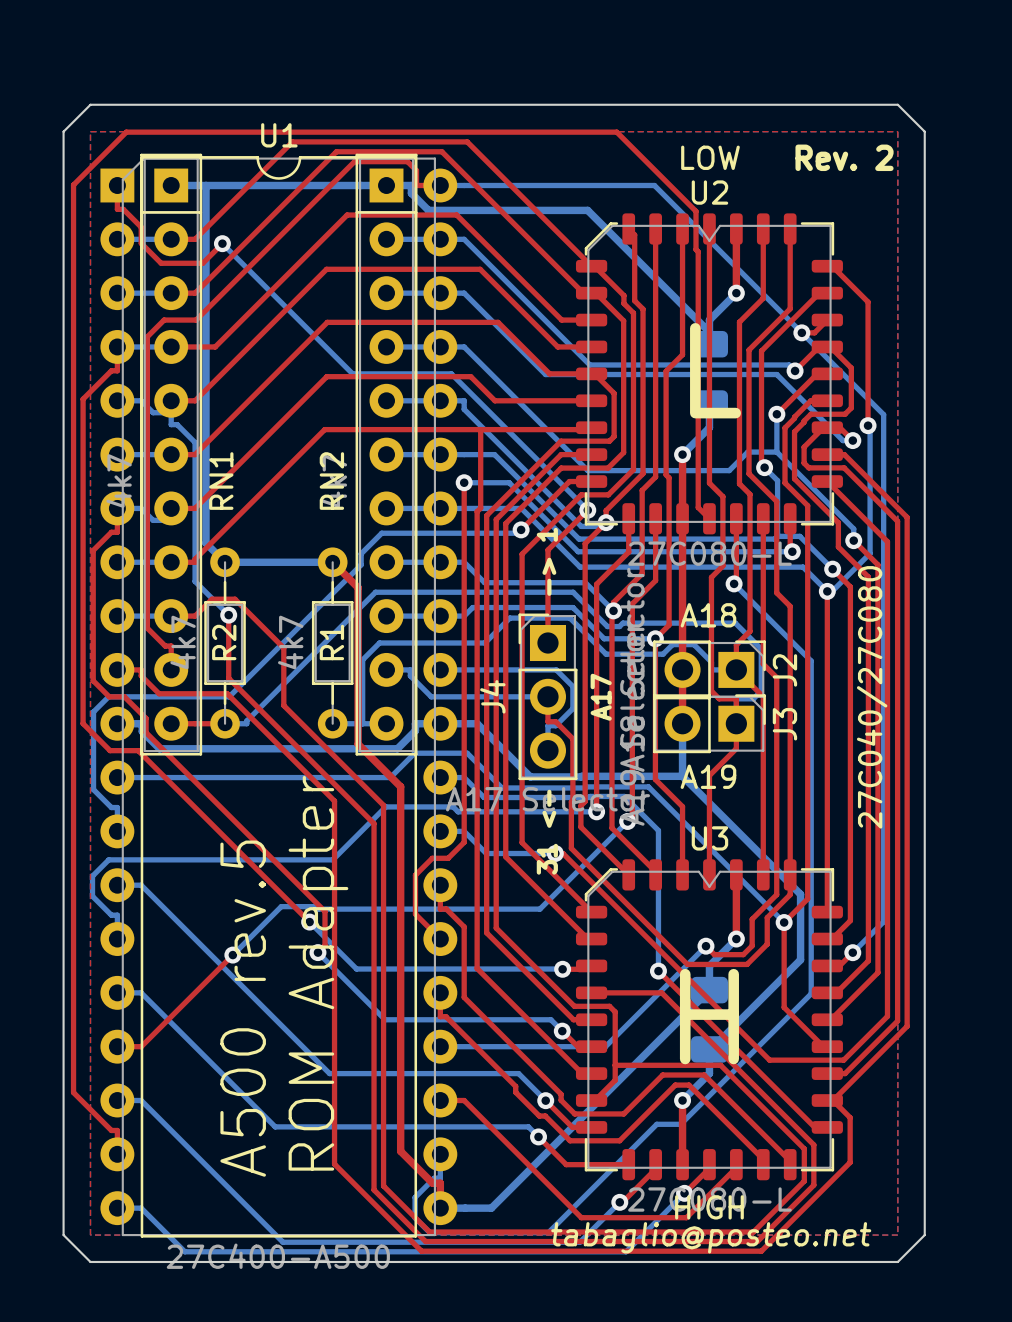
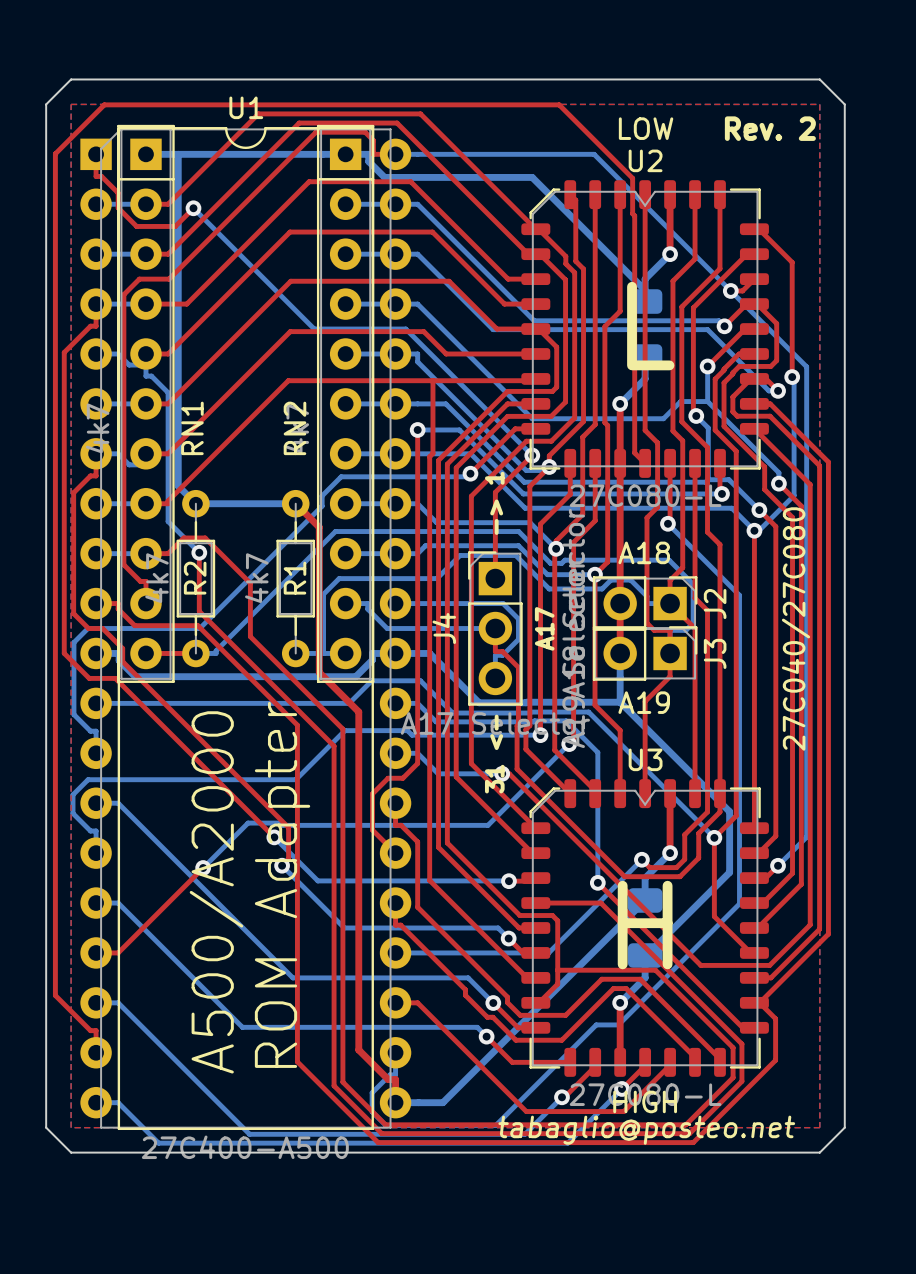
text: A500 rev.5 (243, 1008) -> A500/A2000 (216, 892)

